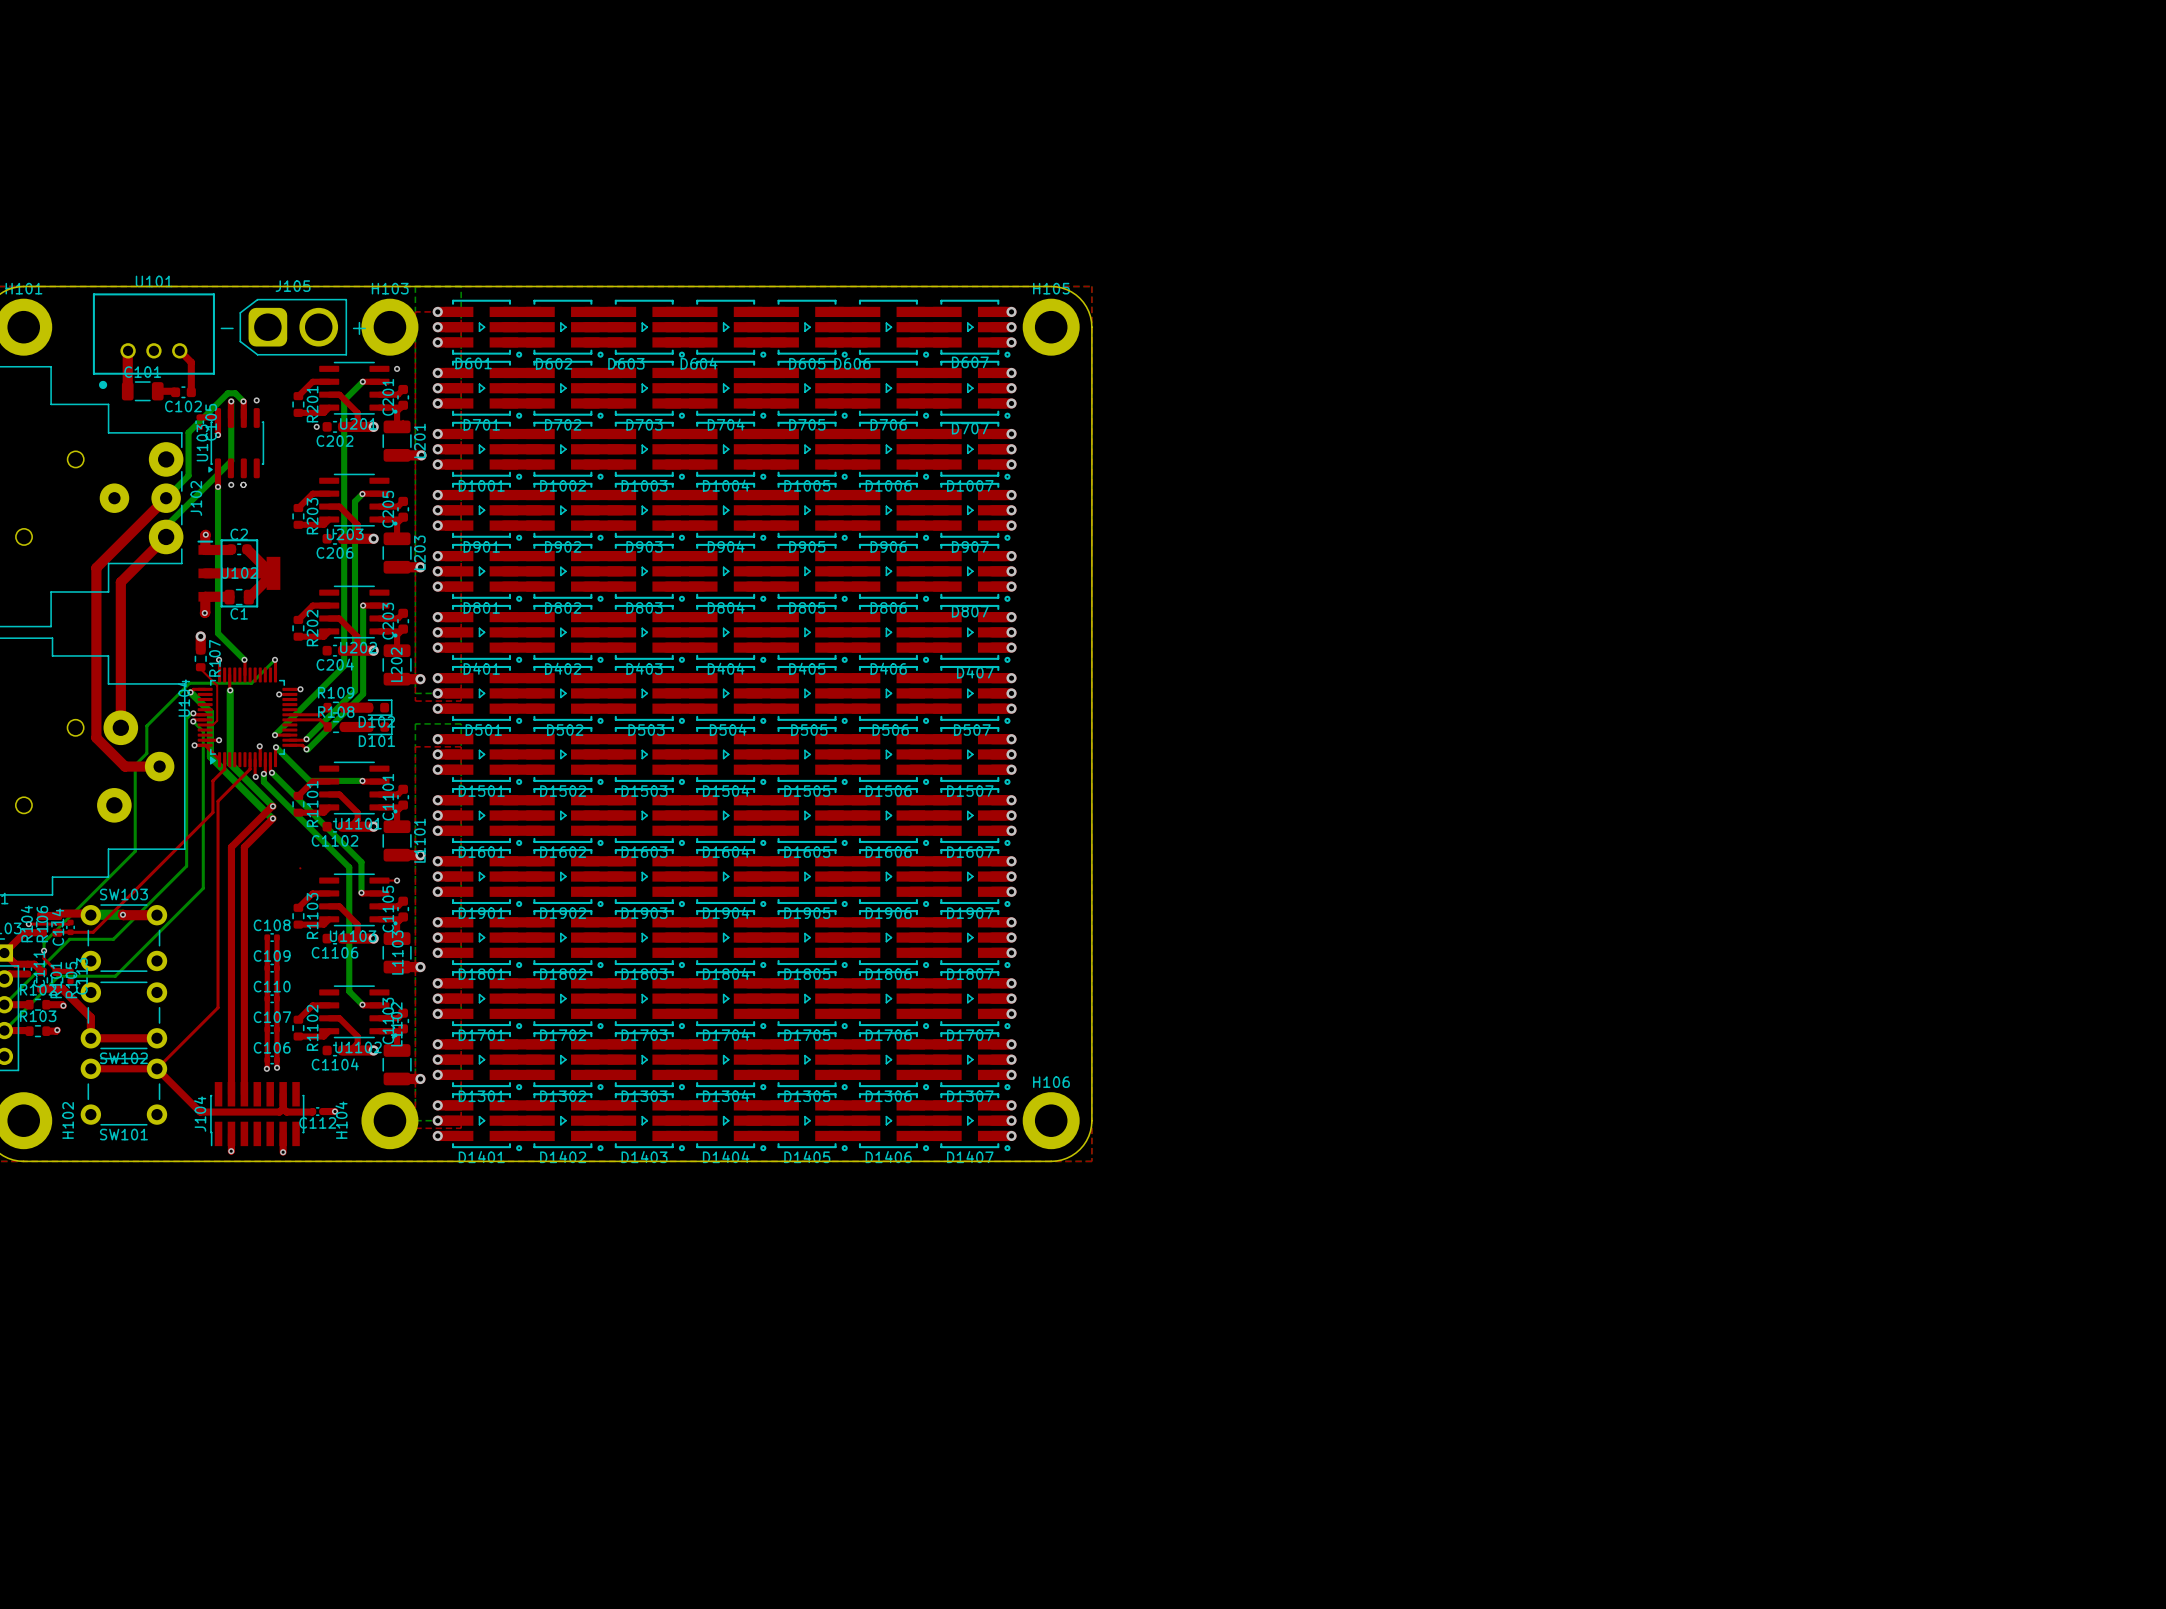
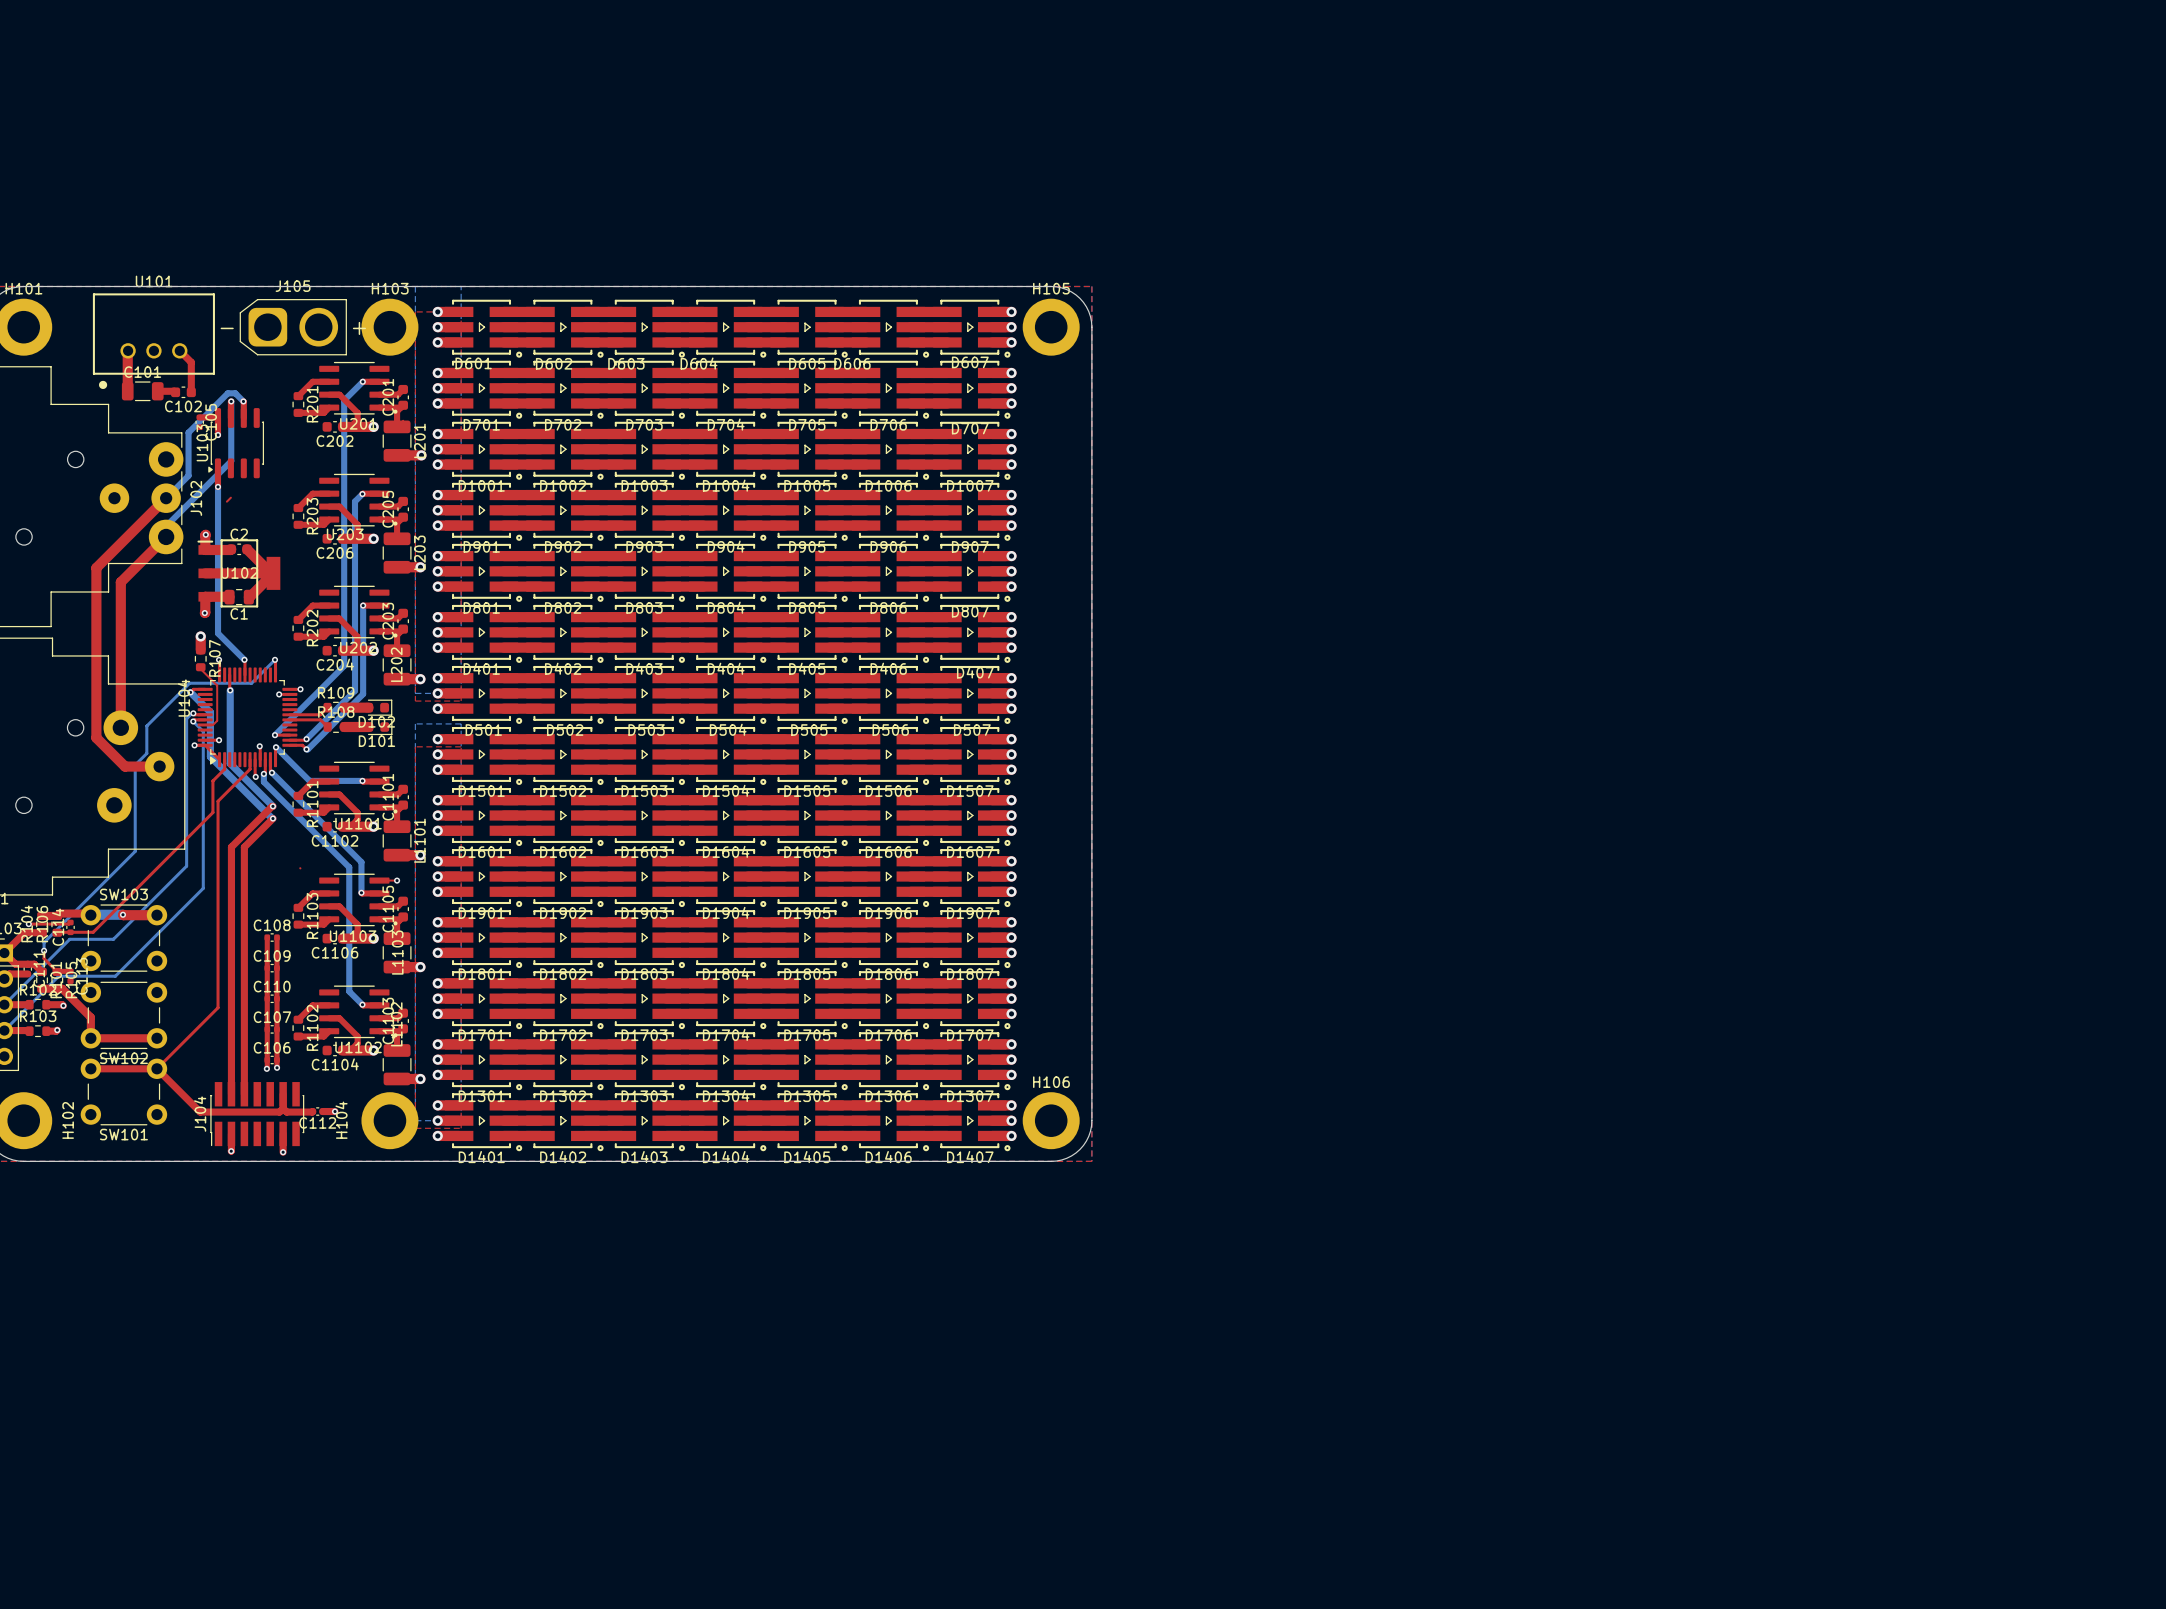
via: (397, 368) -> none
via: (256, 400) -> none
via: (316, 426) -> none
via: (231, 484) -> none
via: (243, 484) -> none
top track: none -> (230, 497) (226, 501)

